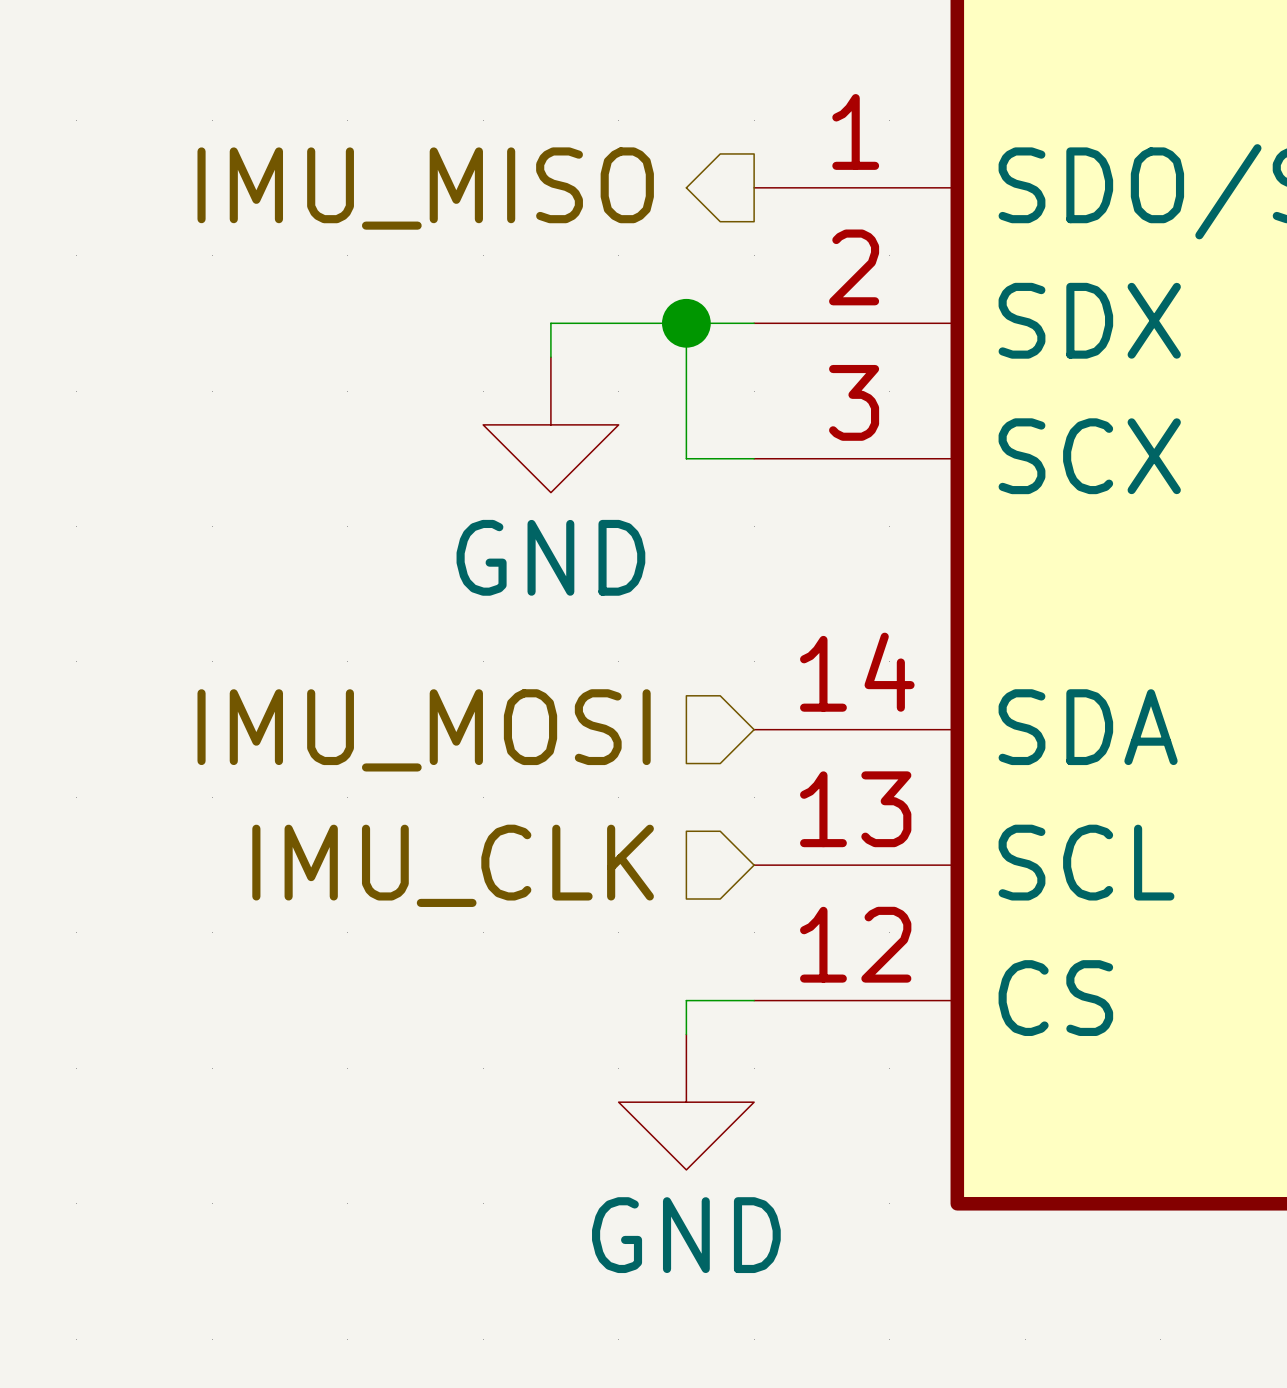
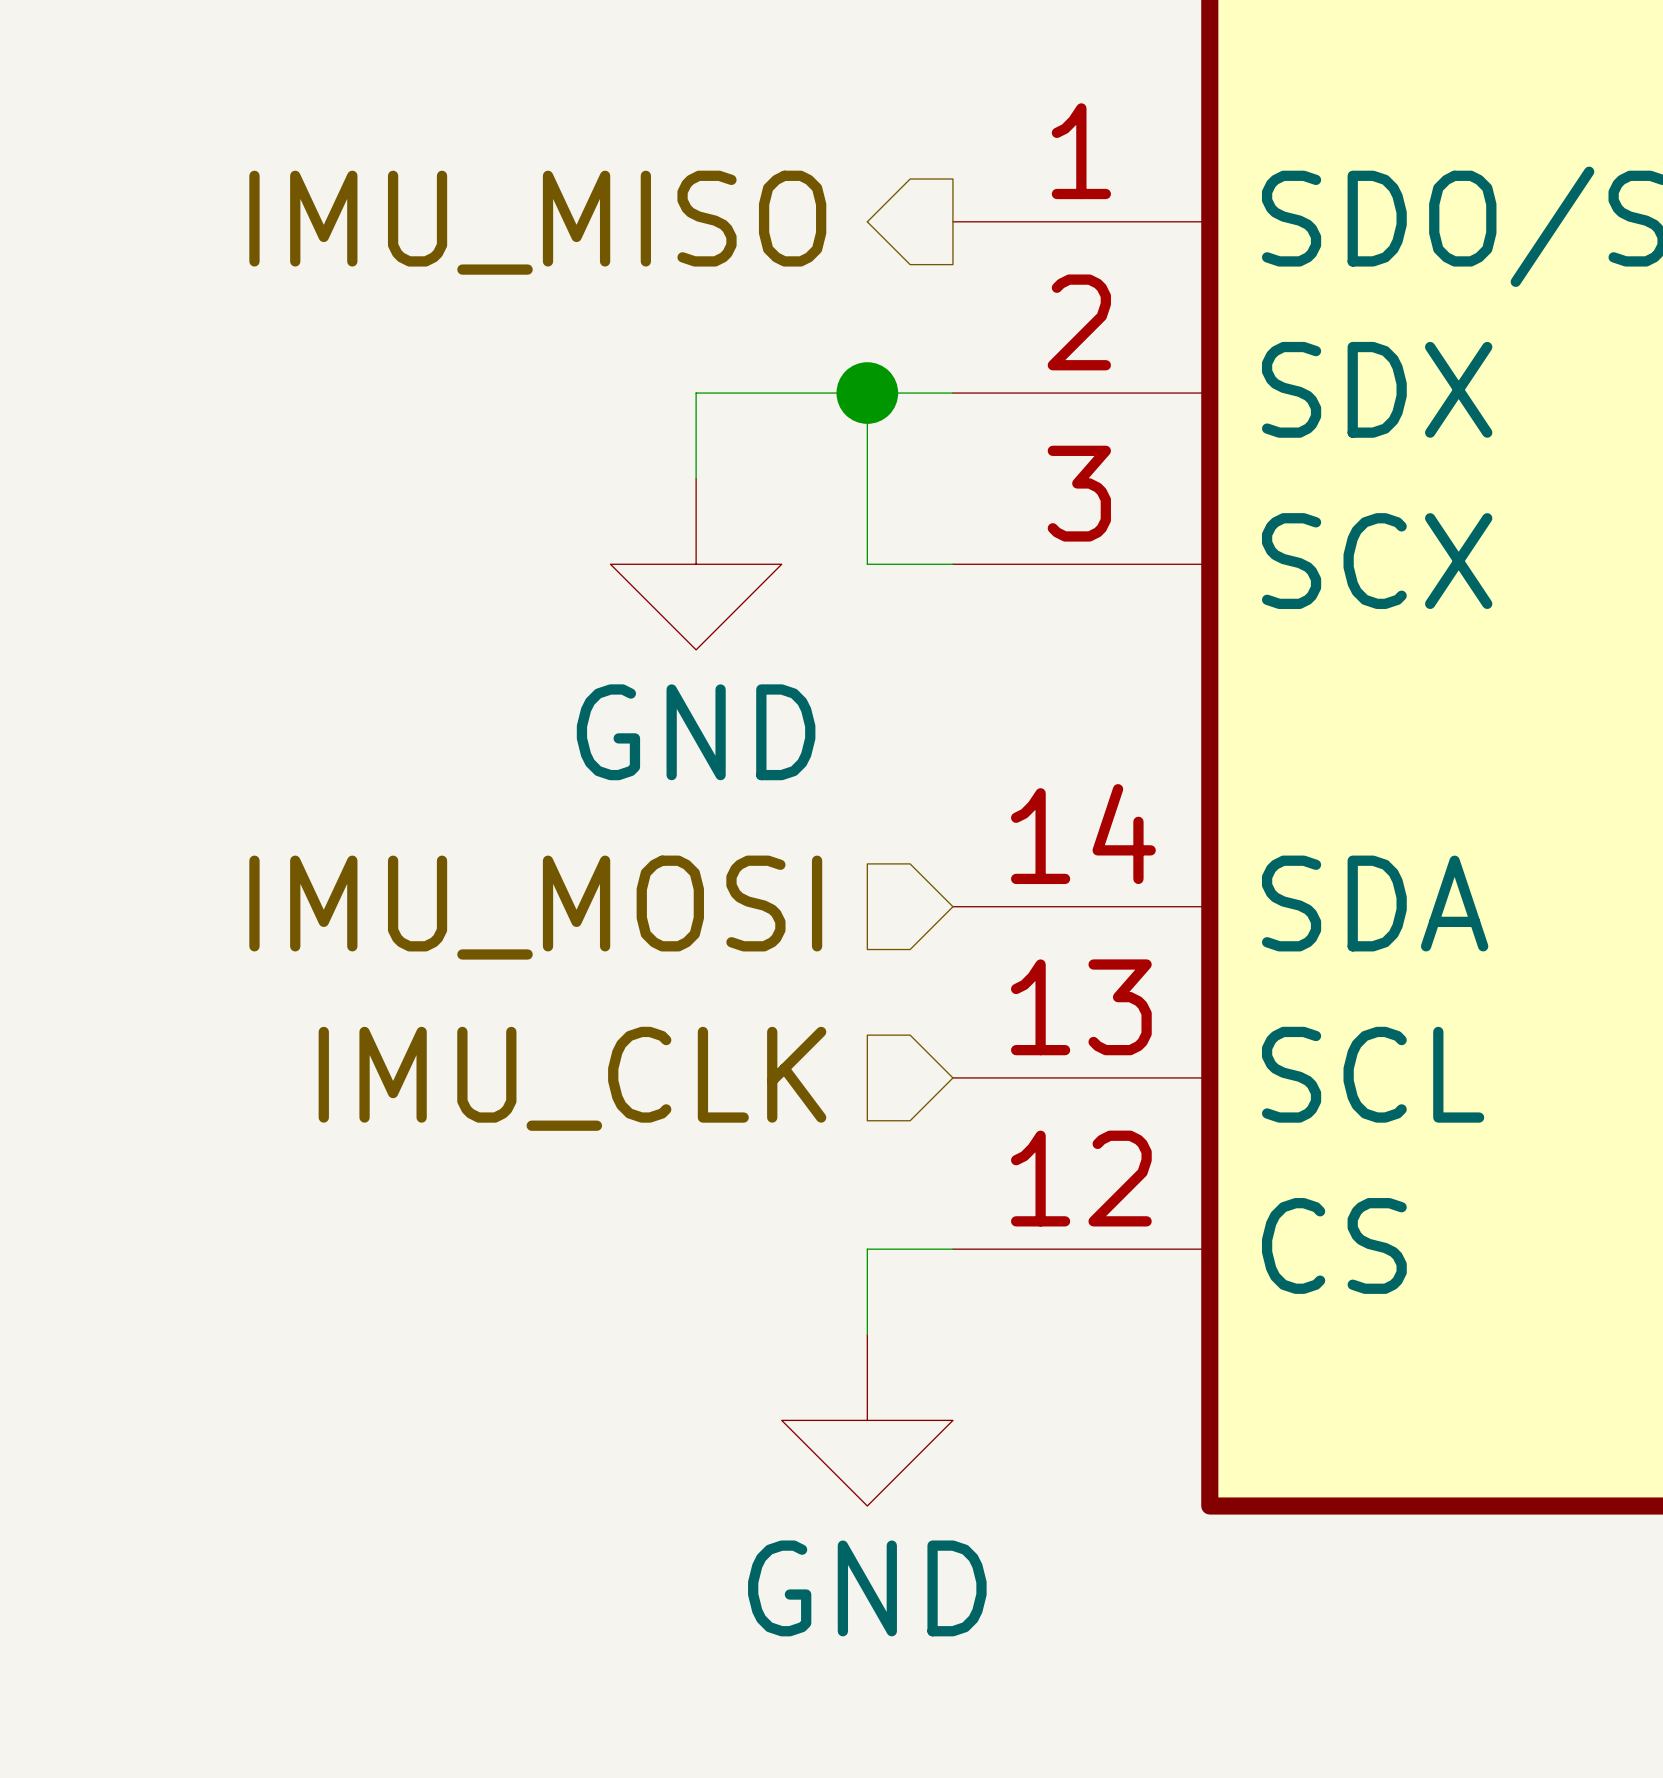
power symbol position: GND (550, 424) -> GND (696, 564)
power symbol position: GND (686, 1102) -> GND (867, 1420)

